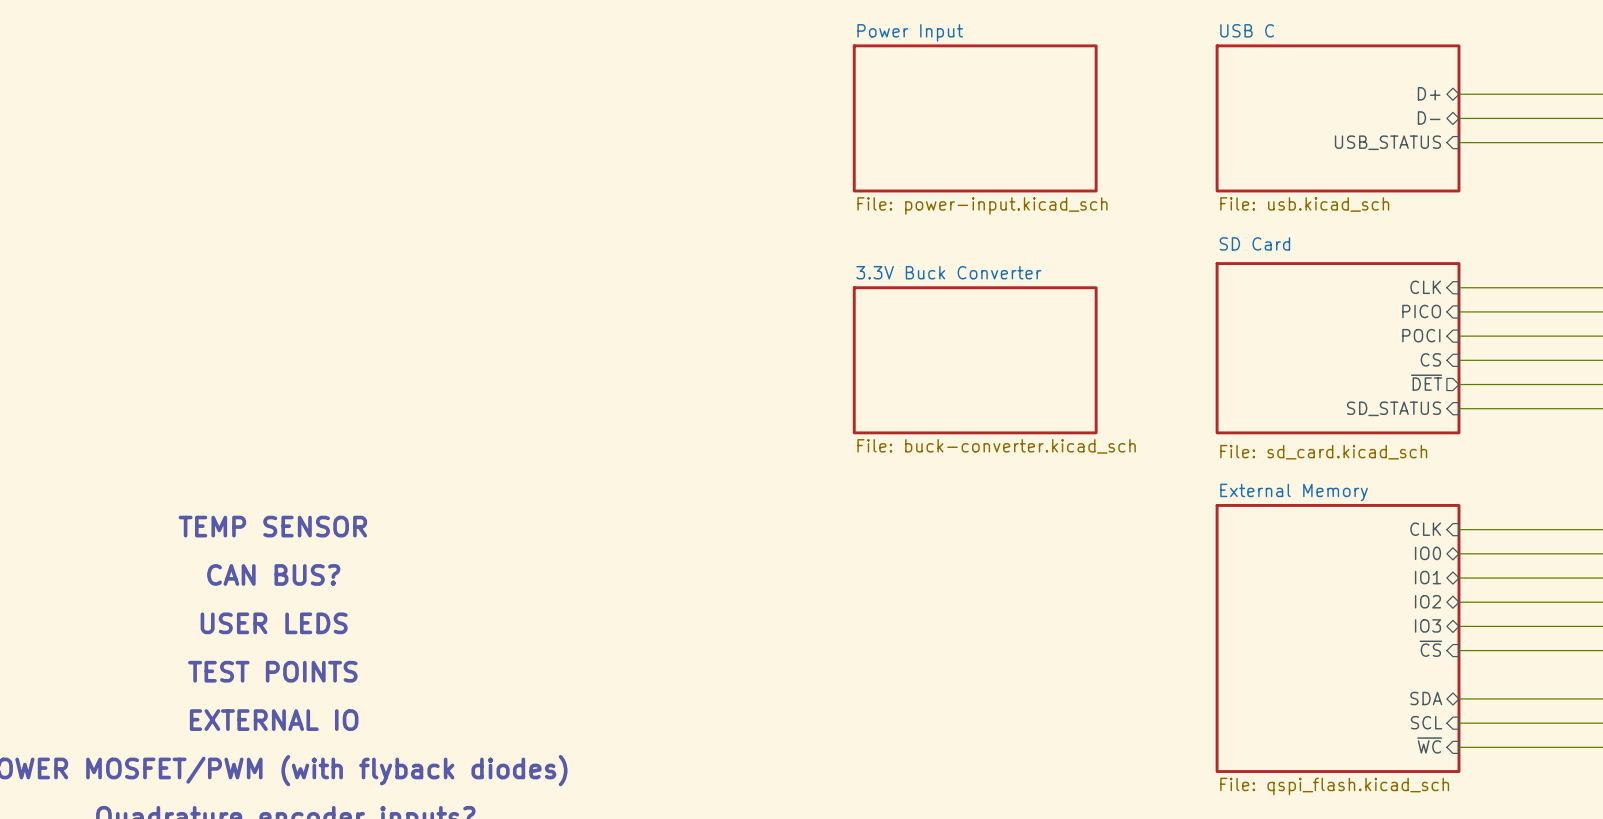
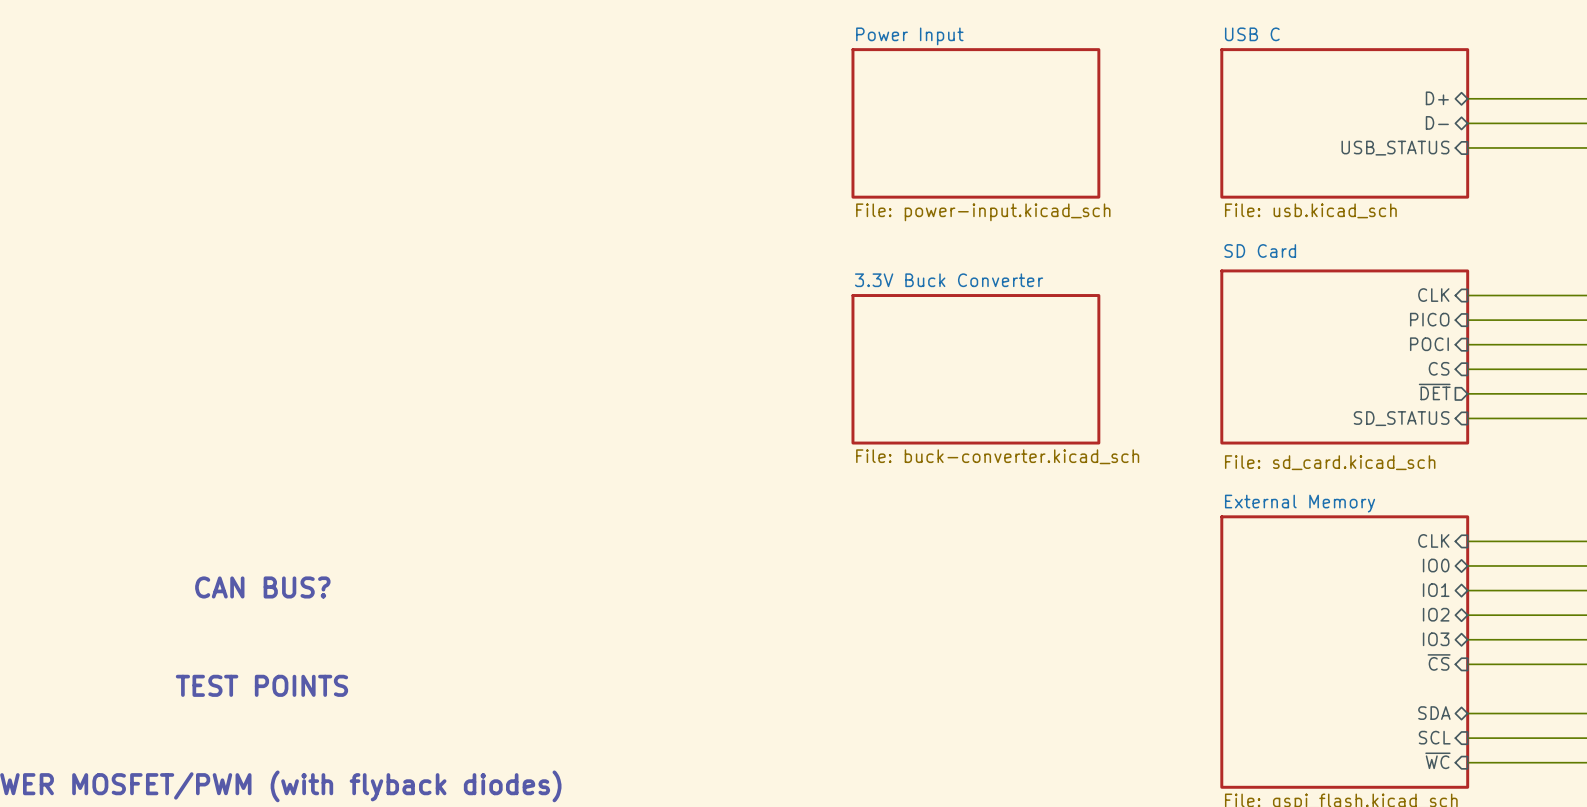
text: TEMP SENSOR (272, 526) -> none
text: USER LEDS (274, 623) -> none
text: EXTERNAL IO (274, 720) -> none

